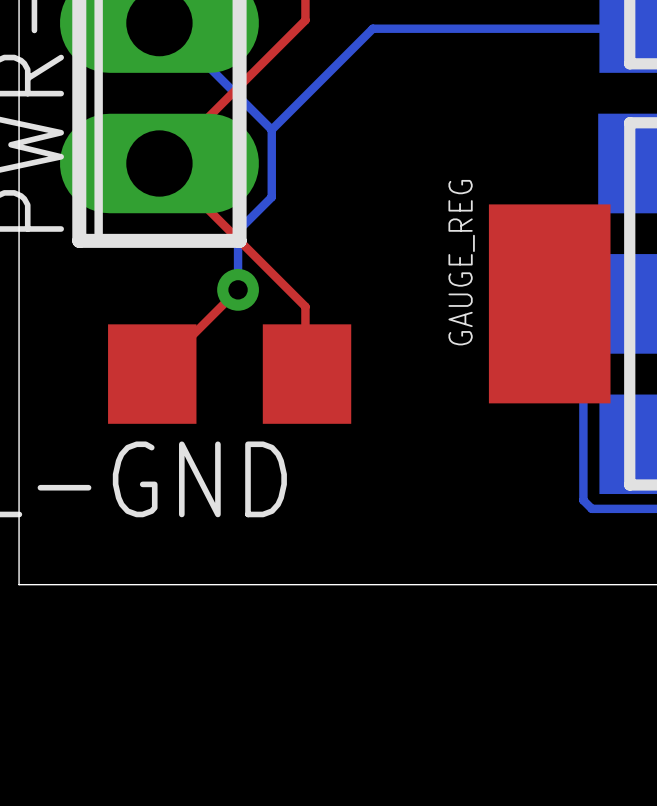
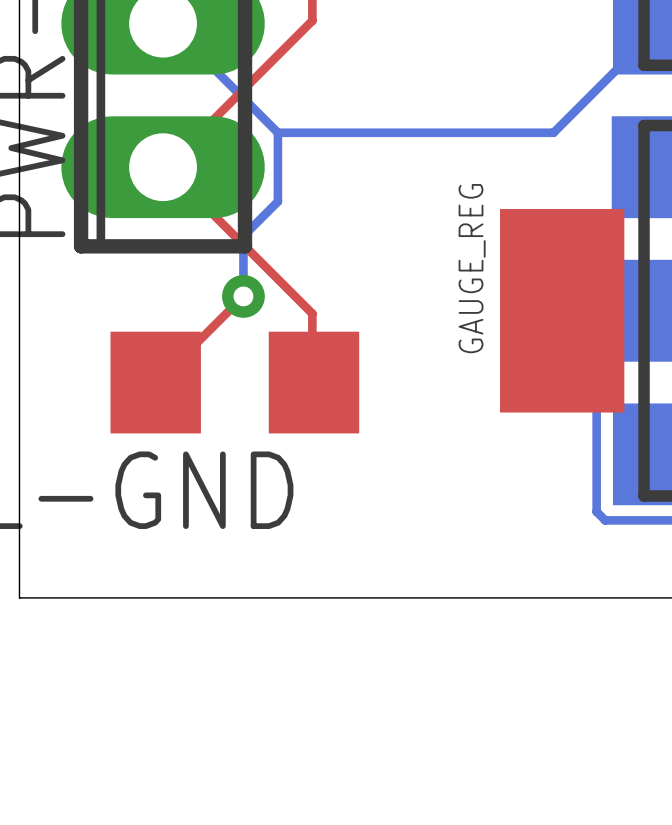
bottom track: (642, 28) (372, 28) (271, 129) -> (656, 29) (553, 132) (277, 132)

